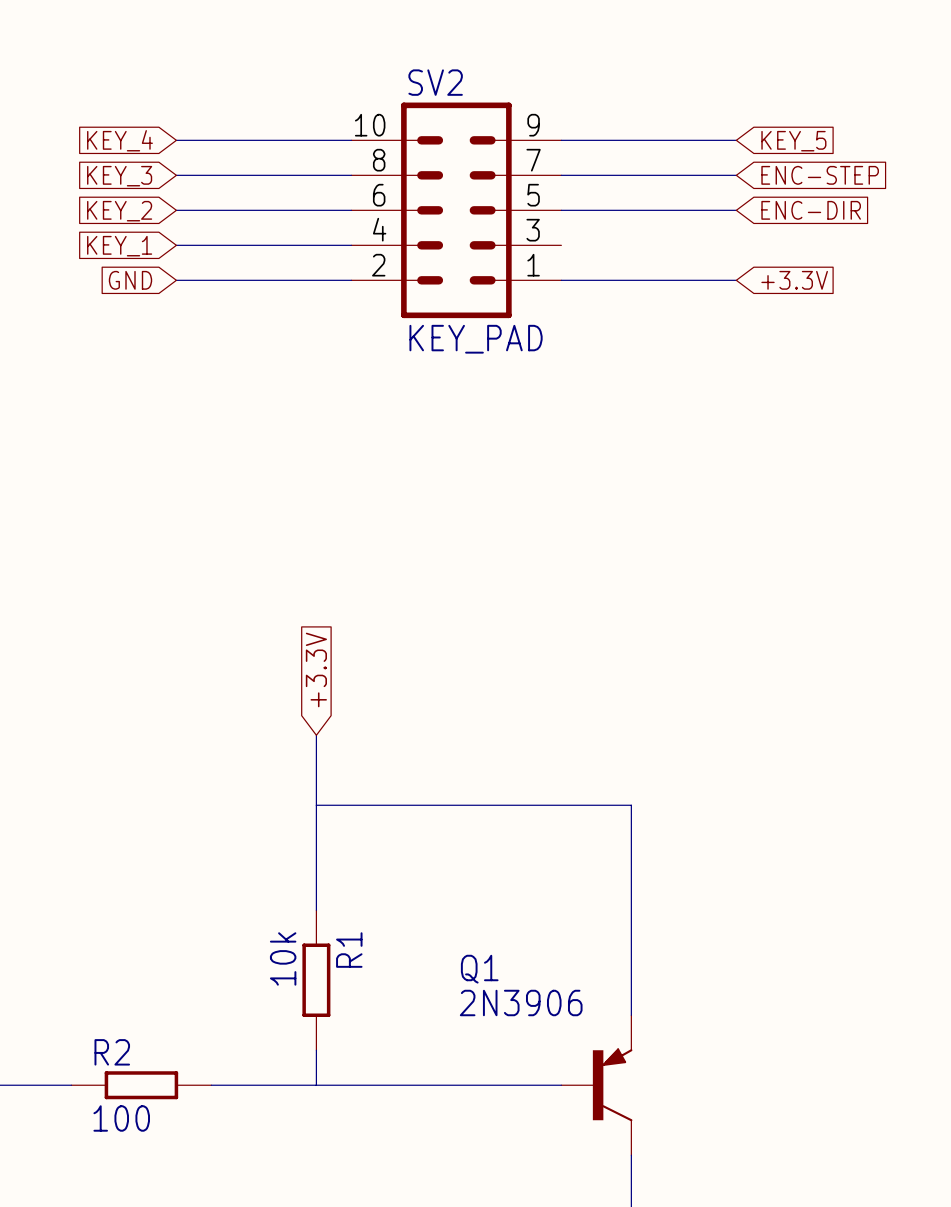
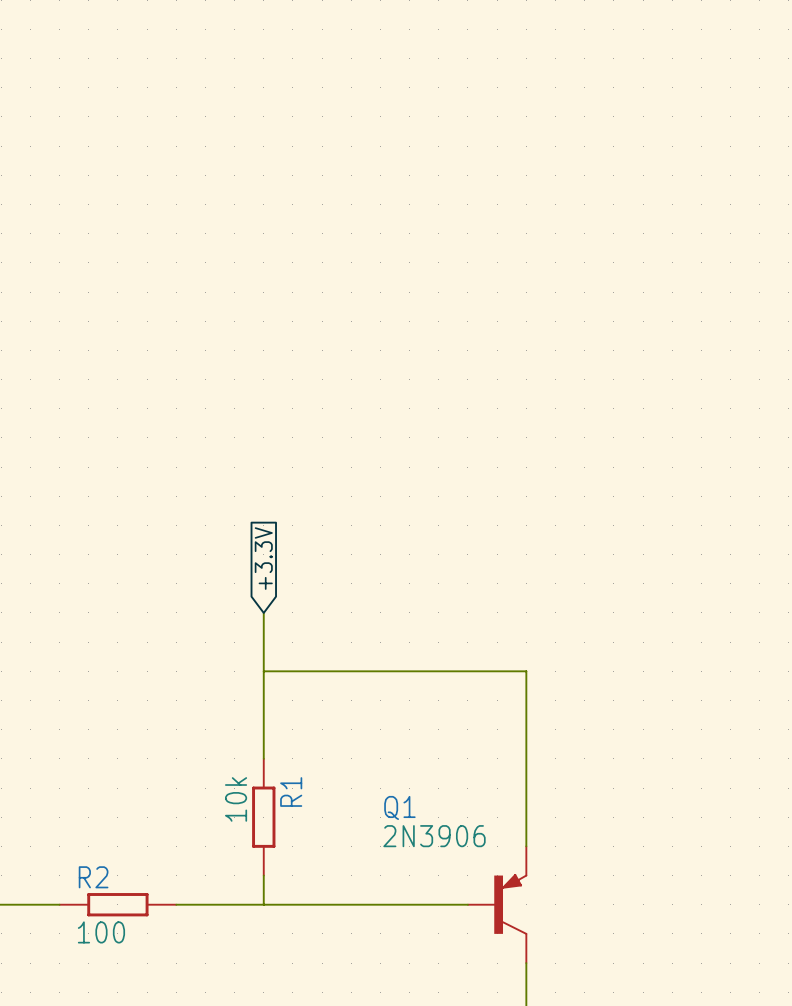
global label: KEY_4 (120, 140) -> none
wire: (176, 140) (351, 140) -> none
wire: (561, 140) (736, 140) -> none
global label: KEY_5 (793, 141) -> none
wire: (176, 175) (351, 175) -> none
wire: (561, 175) (736, 175) -> none
global label: ENC-STEP (820, 175) -> none
global label: KEY_3 (119, 176) -> none
wire: (176, 210) (351, 210) -> none
SV2: KEY_PAD (456, 210) -> none
wire: (561, 210) (736, 210) -> none
global label: ENC-DIR (811, 210) -> none
global label: KEY_2 (119, 211) -> none
wire: (176, 245) (351, 245) -> none
global label: KEY_1 (119, 246) -> none
global label: GND (130, 280) -> none
wire: (176, 280) (351, 280) -> none
wire: (561, 280) (736, 280) -> none
global label: +3.3V (794, 280) -> none

